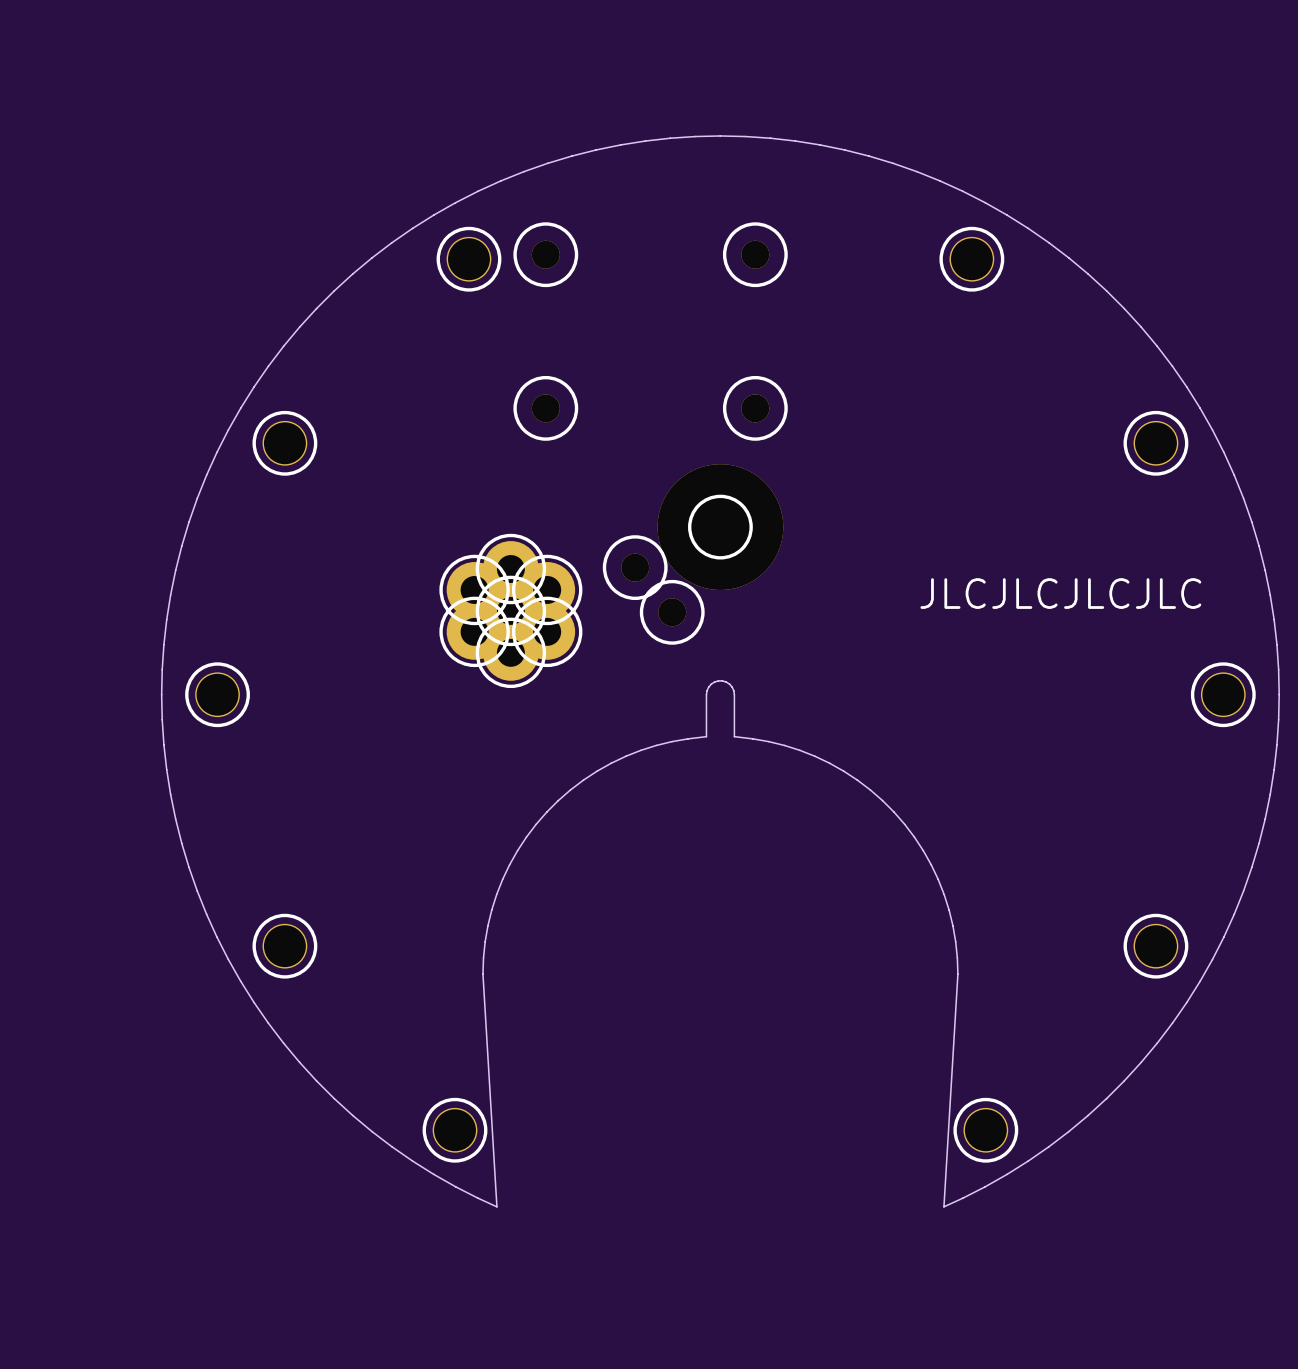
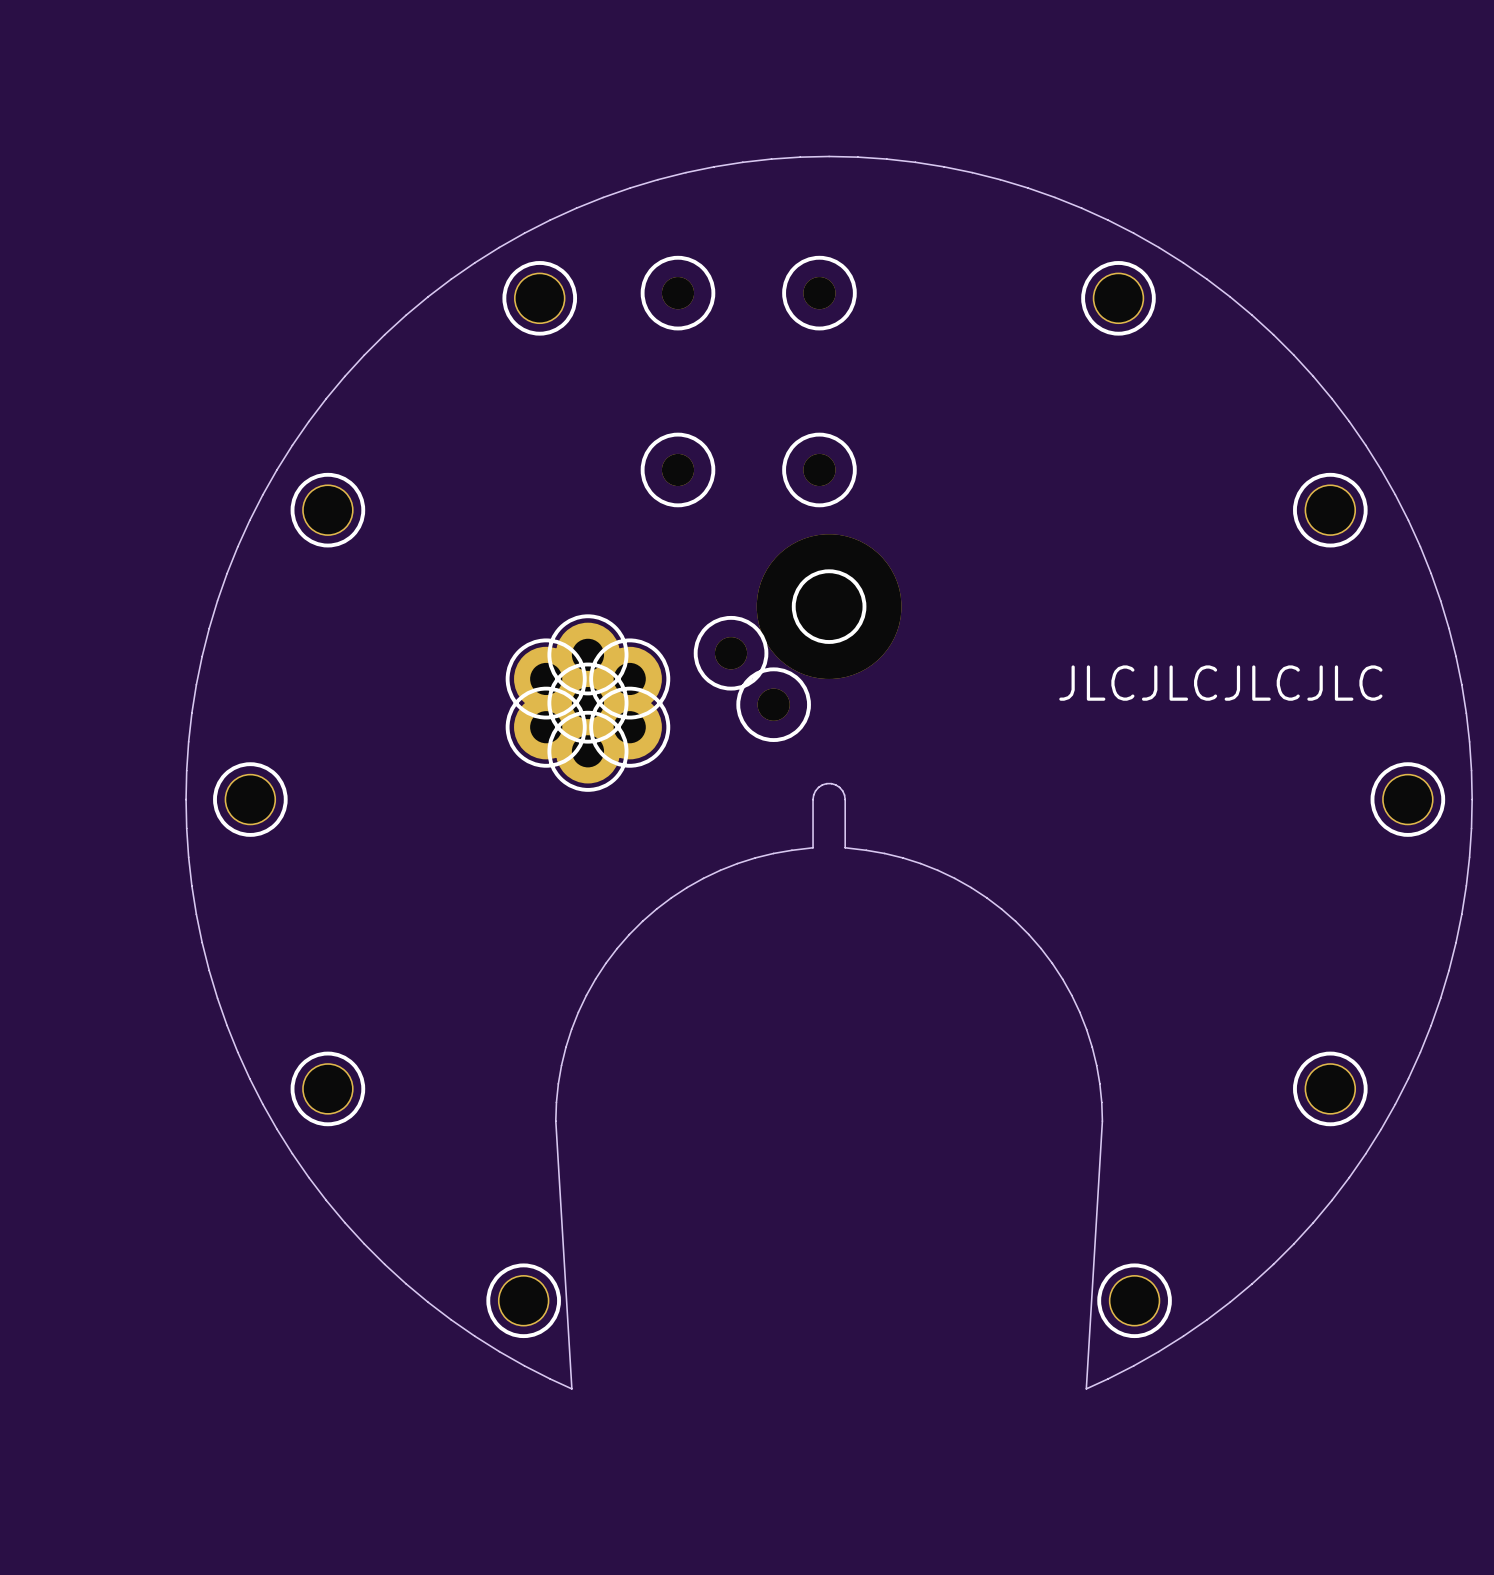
part position: (545, 254) -> (677, 293)
part position: (755, 254) -> (819, 293)
part position: (545, 408) -> (677, 469)
part position: (755, 408) -> (819, 469)

